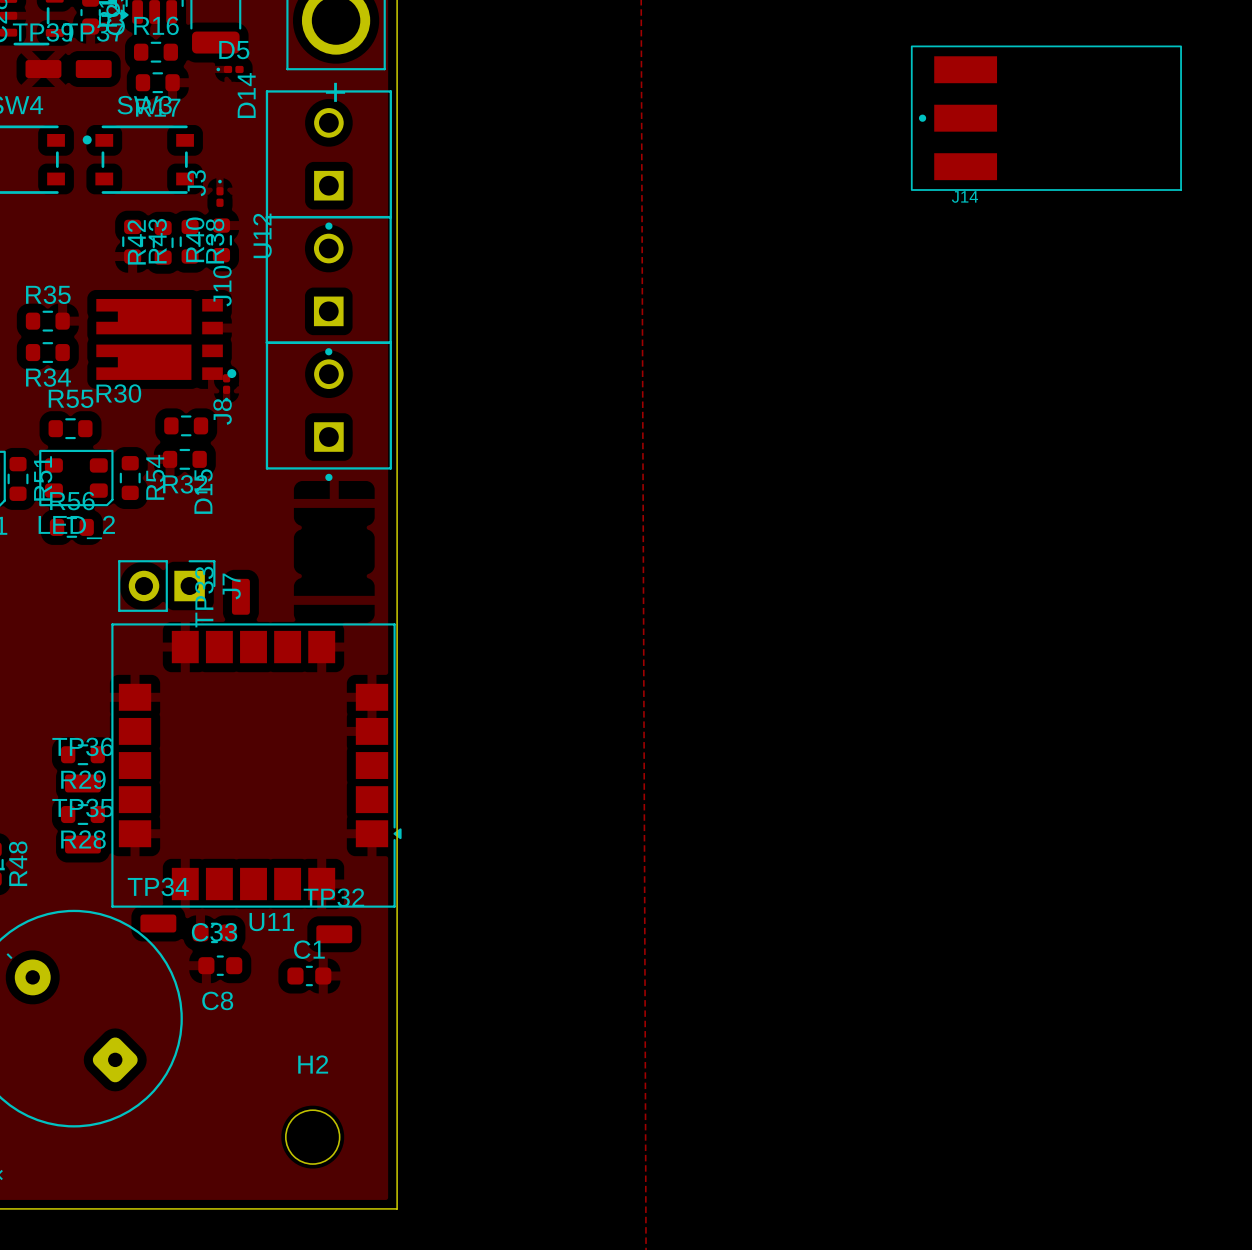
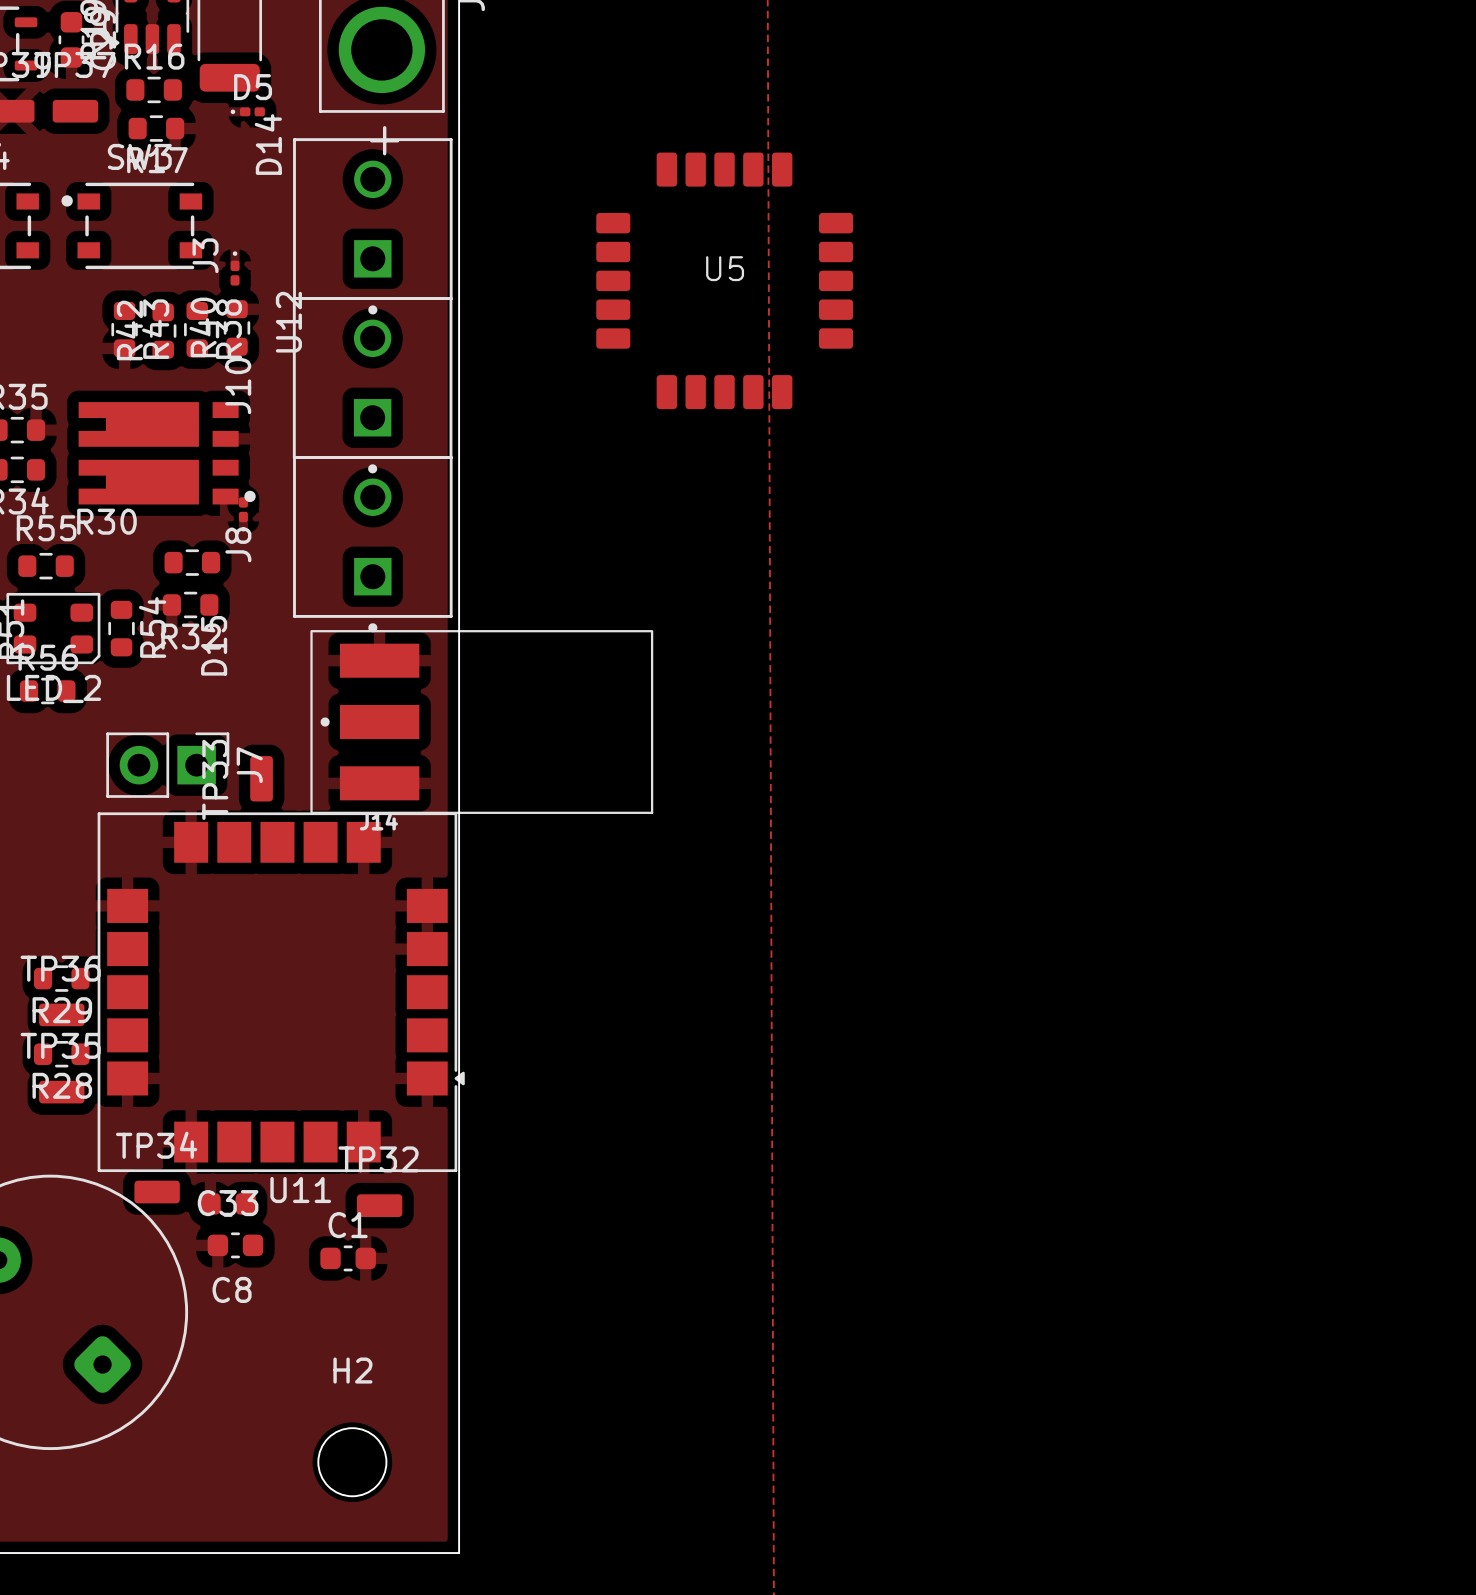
J14 position: (1046, 118) -> (481, 722)
U5: none -> (724, 280)

